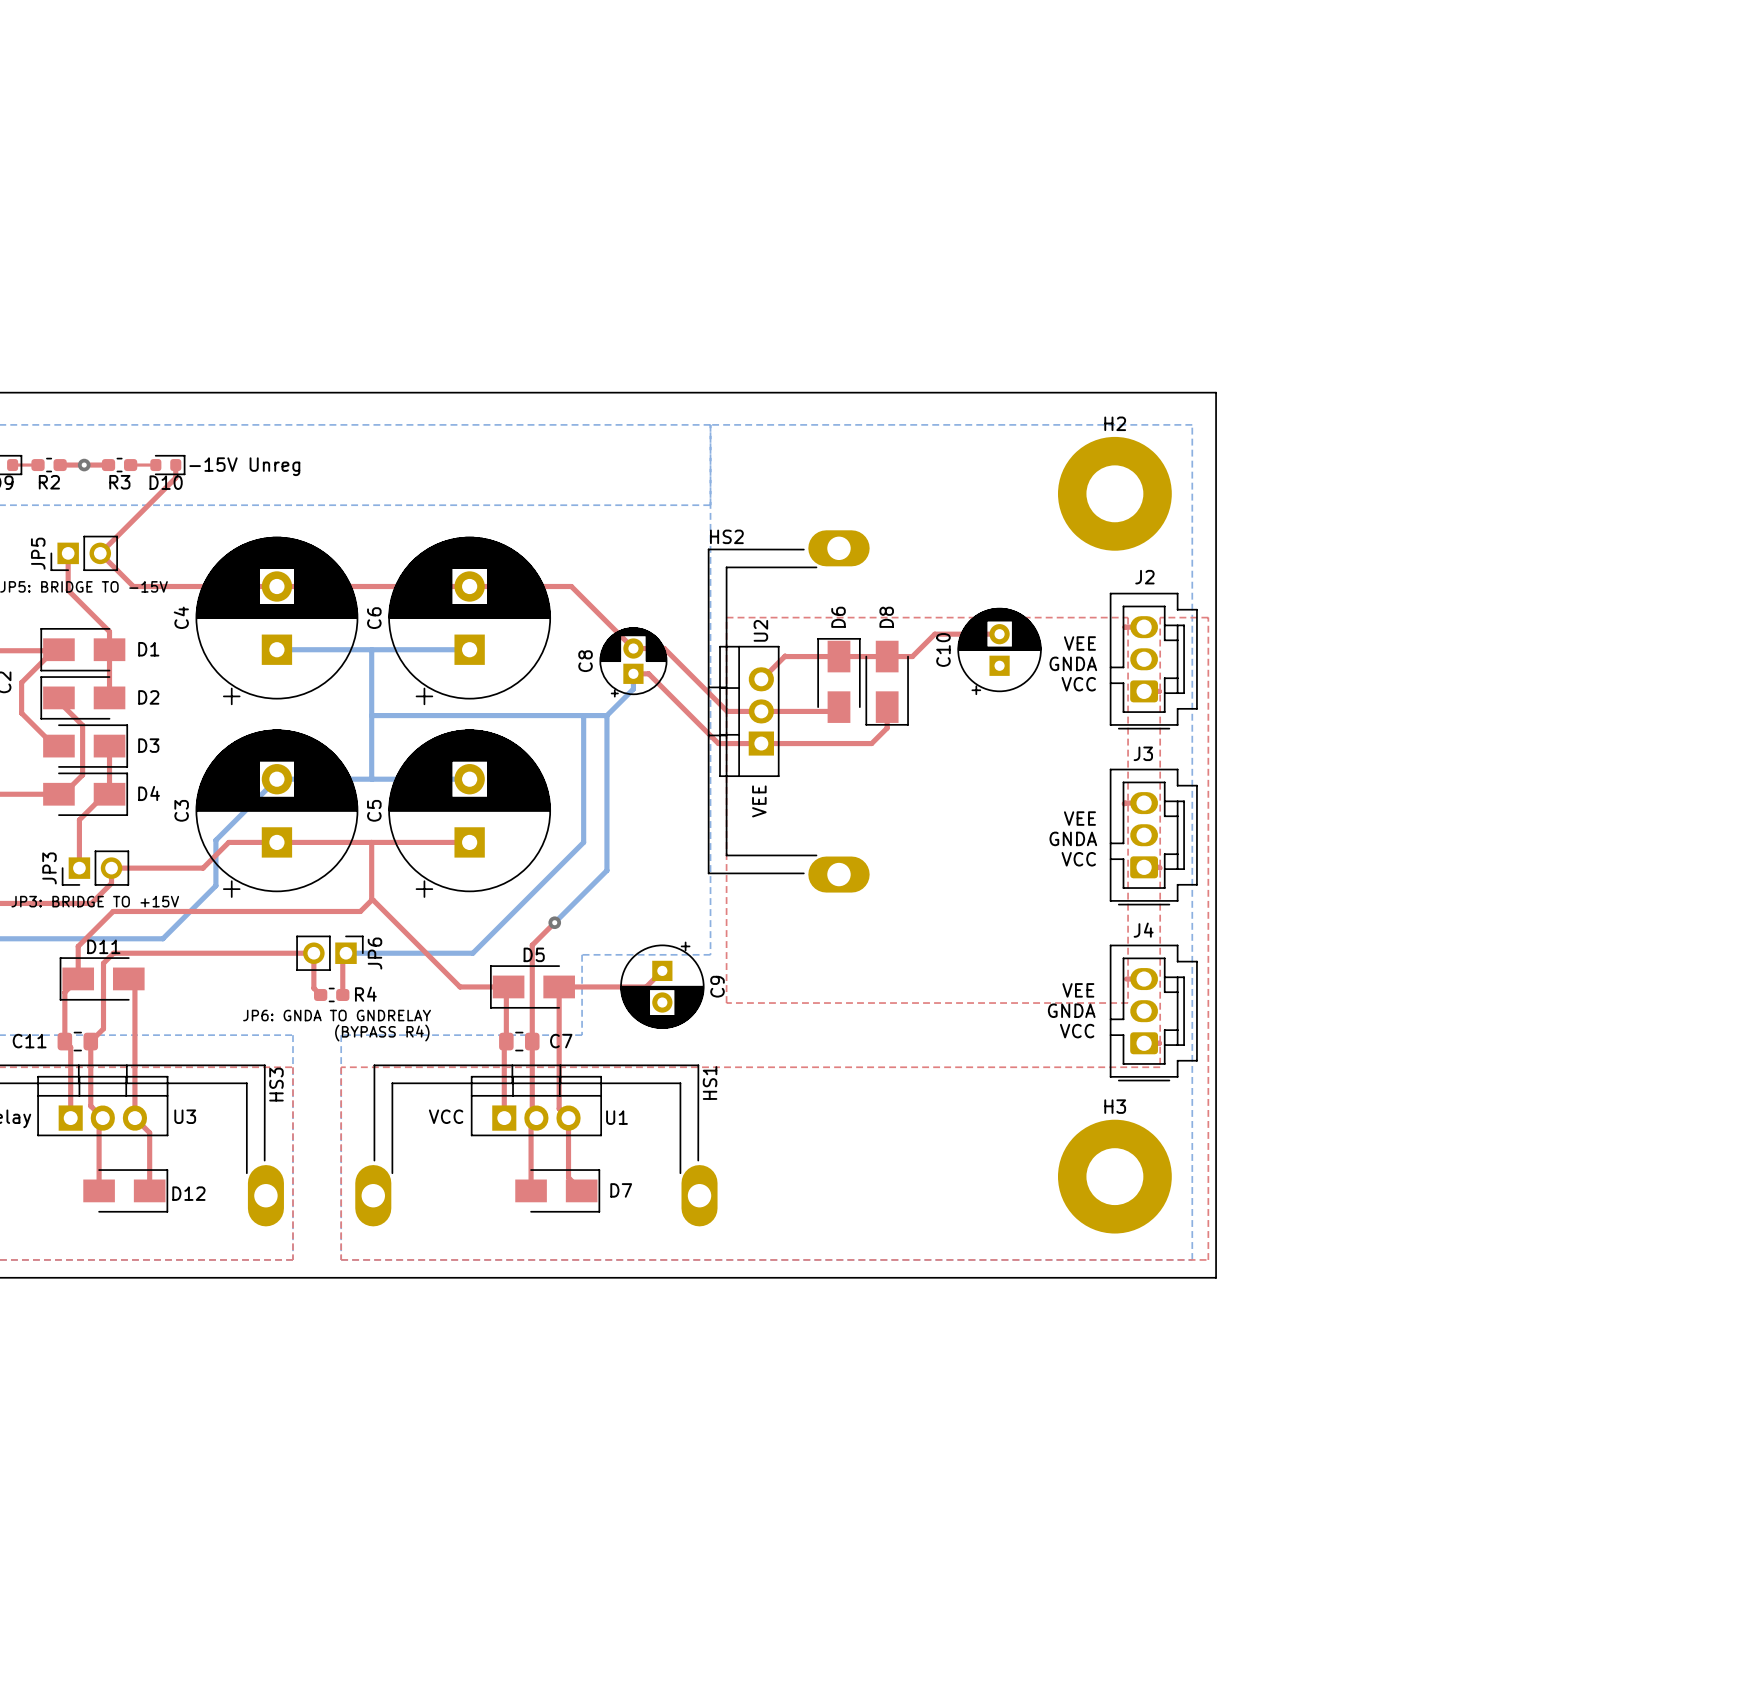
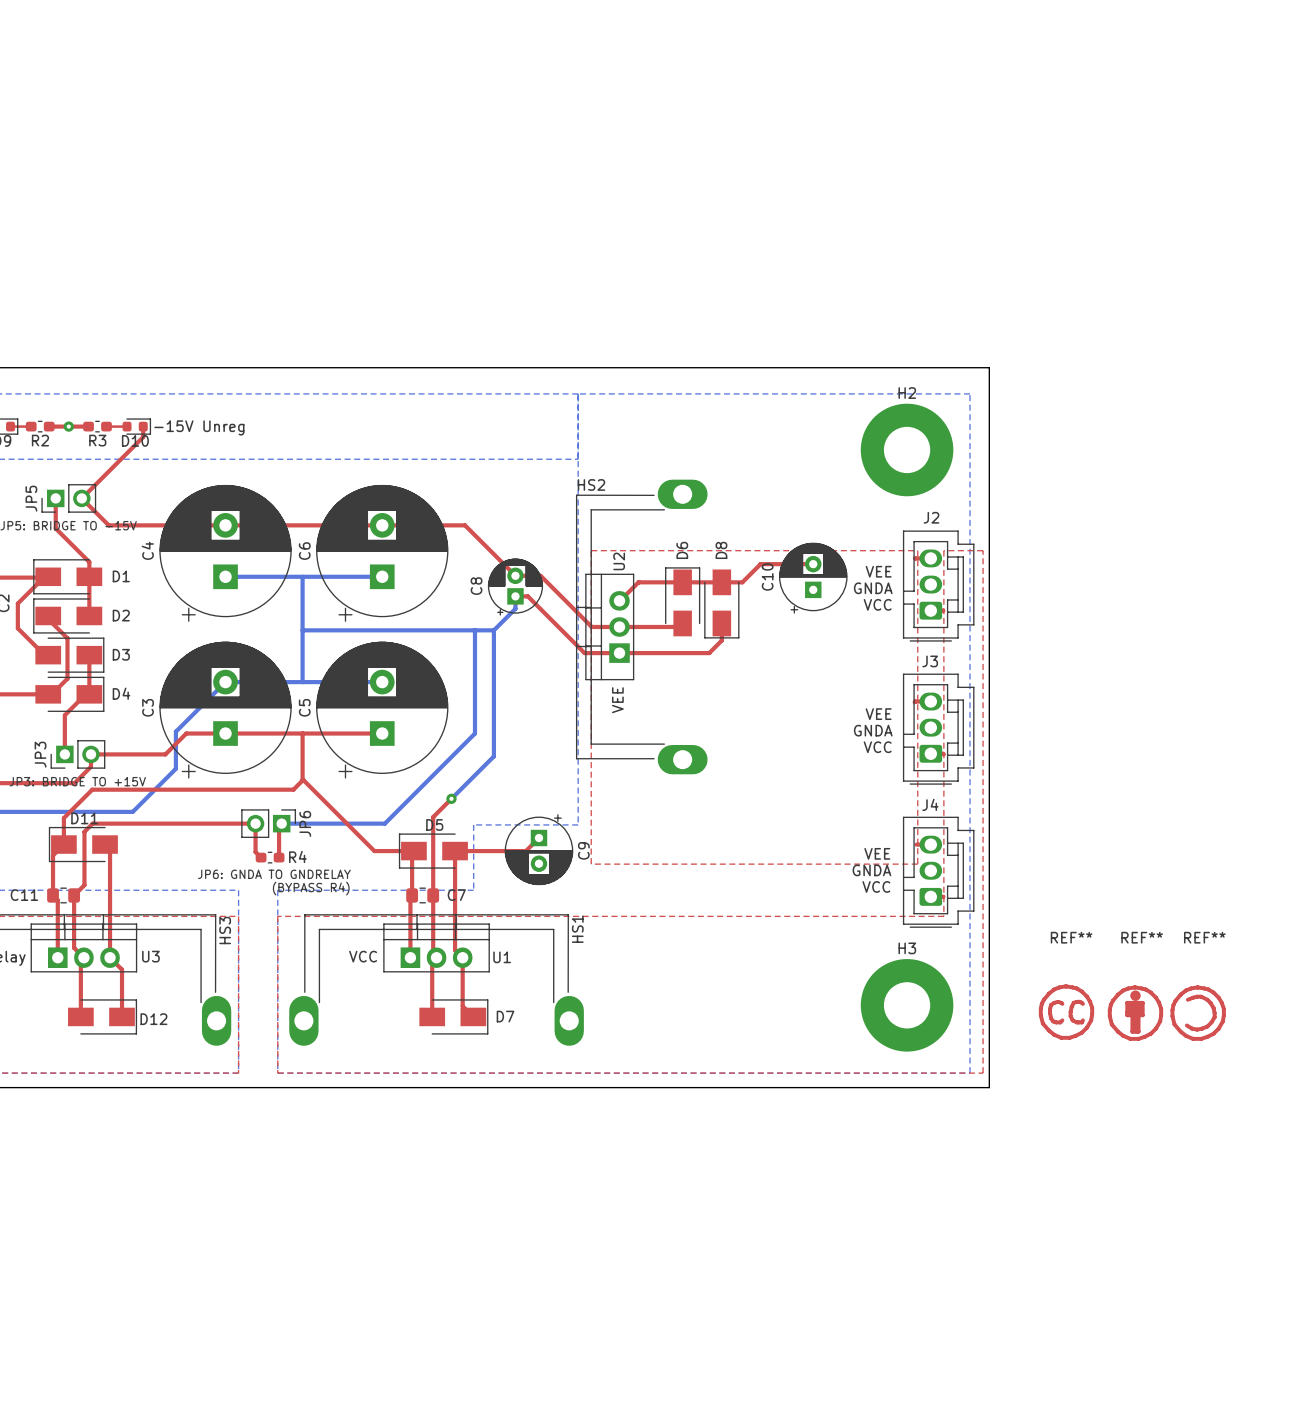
REF**: none -> (1066, 1012)
REF**: none -> (1135, 1013)
REF**: none -> (1198, 1013)

